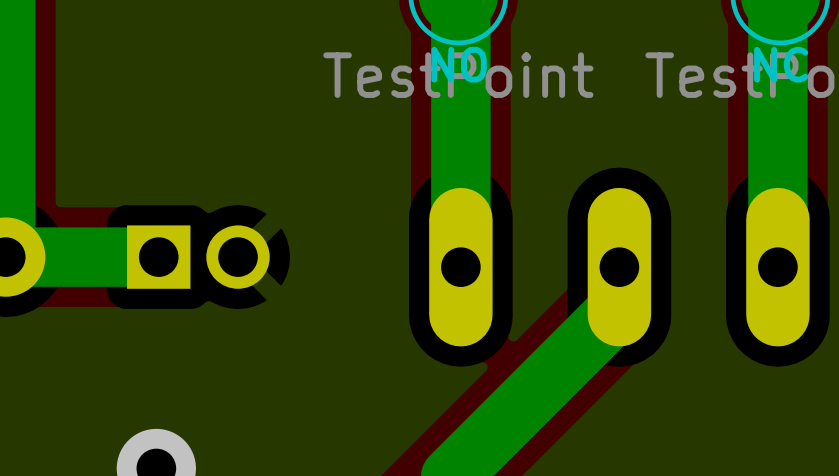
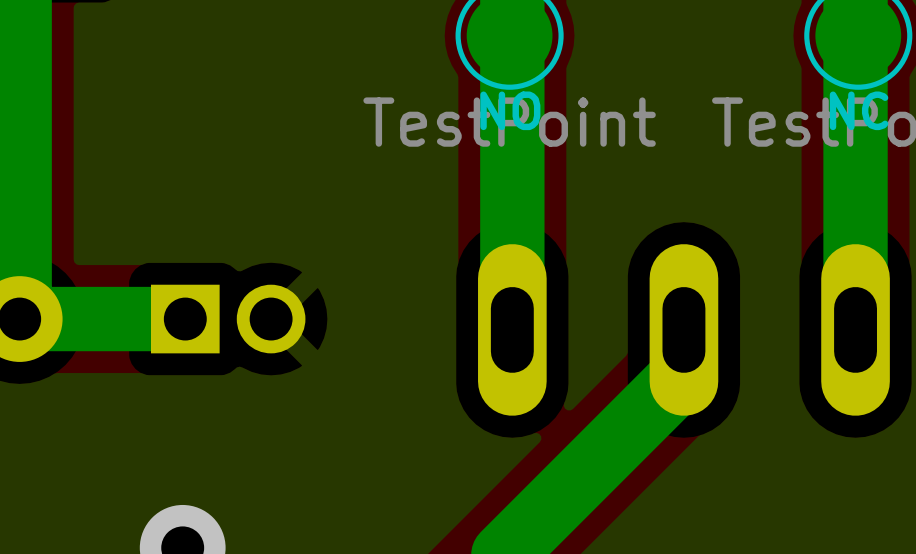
part footprint: [429, 187, 810, 347] -> [478, 244, 890, 416]

